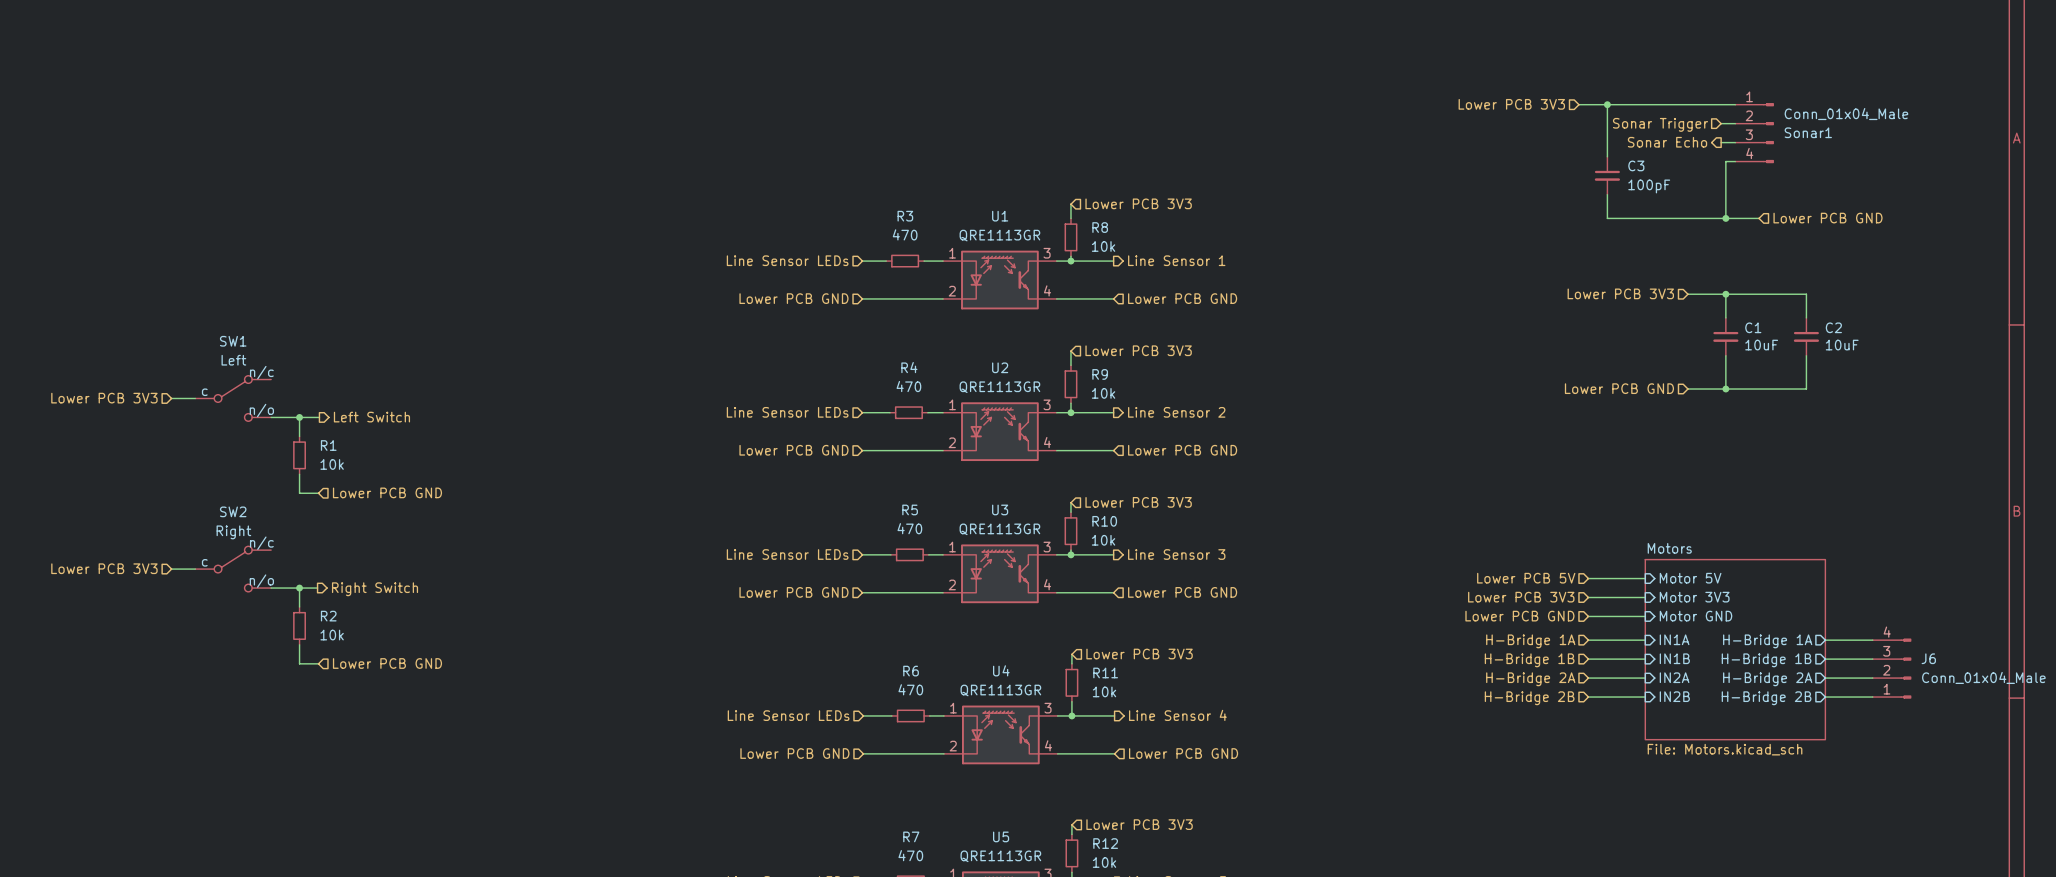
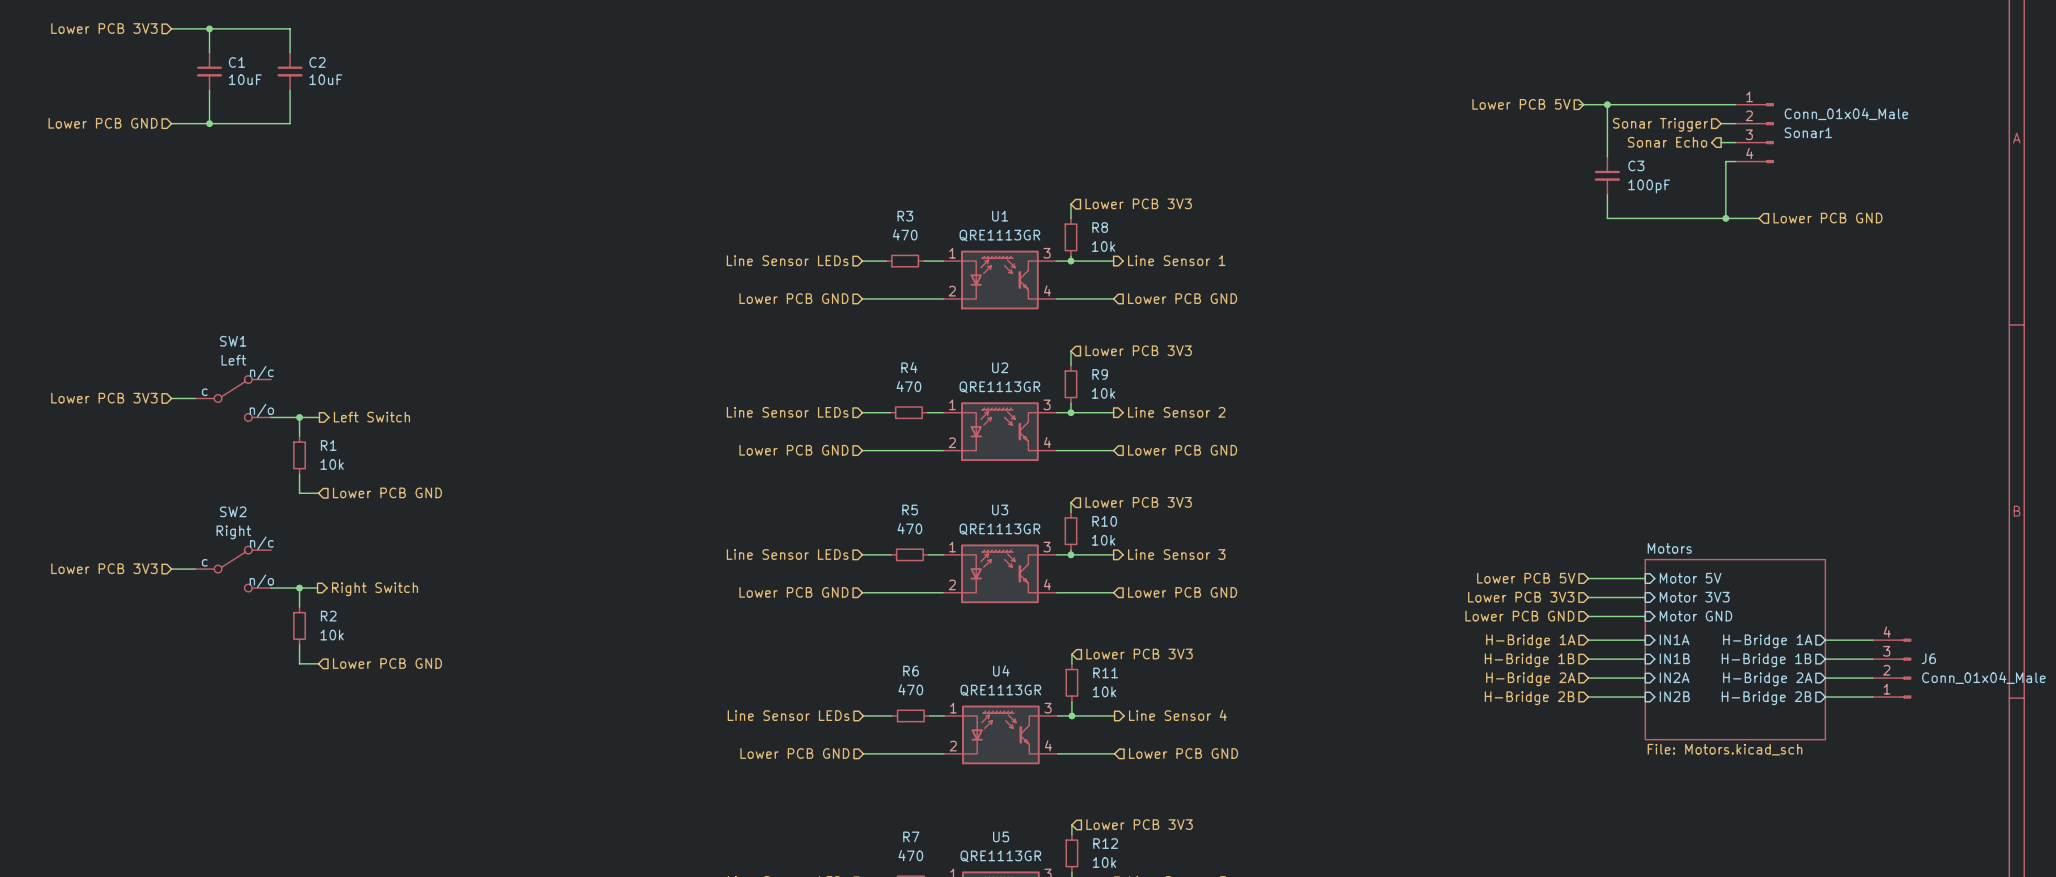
hierarchical label: none -> Lower PCB 3V3 (104, 28)
wire: none -> (171, 28) (290, 28) (290, 52)
wire: none -> (209, 28) (209, 52)
junction: none -> (209, 28)
wire: none -> (209, 90) (209, 123)
wire: none -> (290, 90) (290, 123) (171, 123)
hierarchical label: Lower PCB 3V3 (1511, 104) -> Lower PCB 5V (1521, 104)
hierarchical label: none -> Lower PCB GND (103, 123)
junction: none -> (209, 123)
hierarchical label: Lower PCB 3V3 (1620, 293) -> none
wire: (1687, 294) (1806, 294) (1806, 317) -> none
wire: (1725, 294) (1725, 317) -> none
junction: (1725, 294) -> none
C1 position: (1725, 336) -> (209, 71)
C2 position: (1806, 336) -> (290, 71)
wire: (1725, 355) (1725, 389) -> none
wire: (1806, 355) (1806, 389) (1687, 389) -> none
hierarchical label: Lower PCB GND (1619, 388) -> none
junction: (1725, 389) -> none

